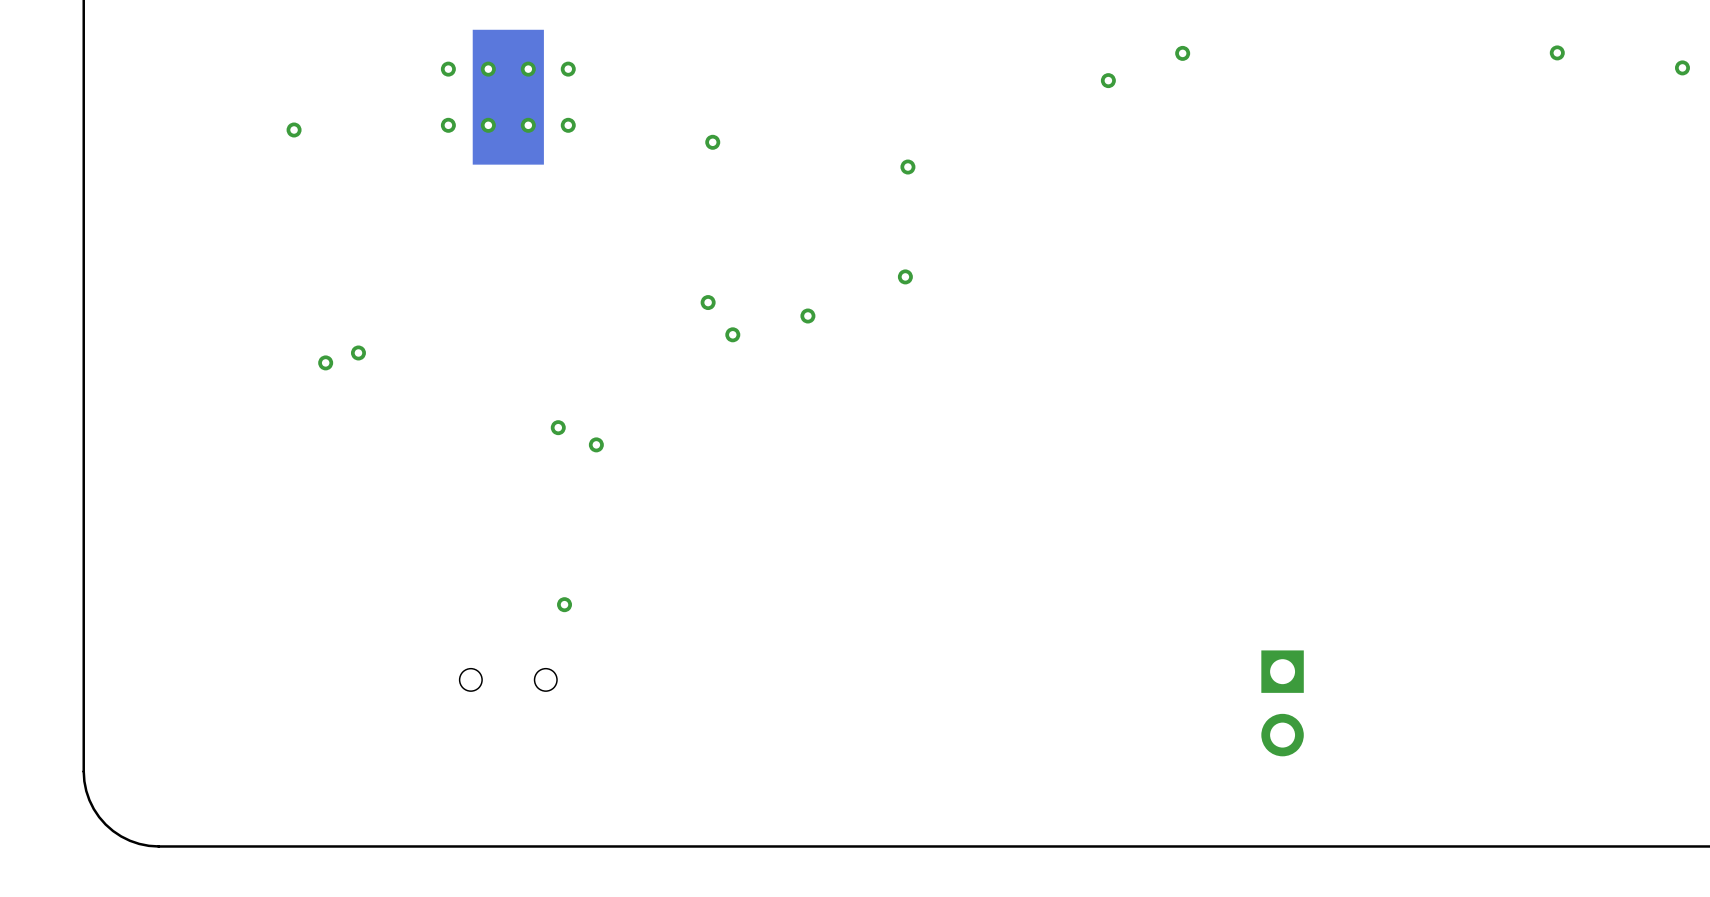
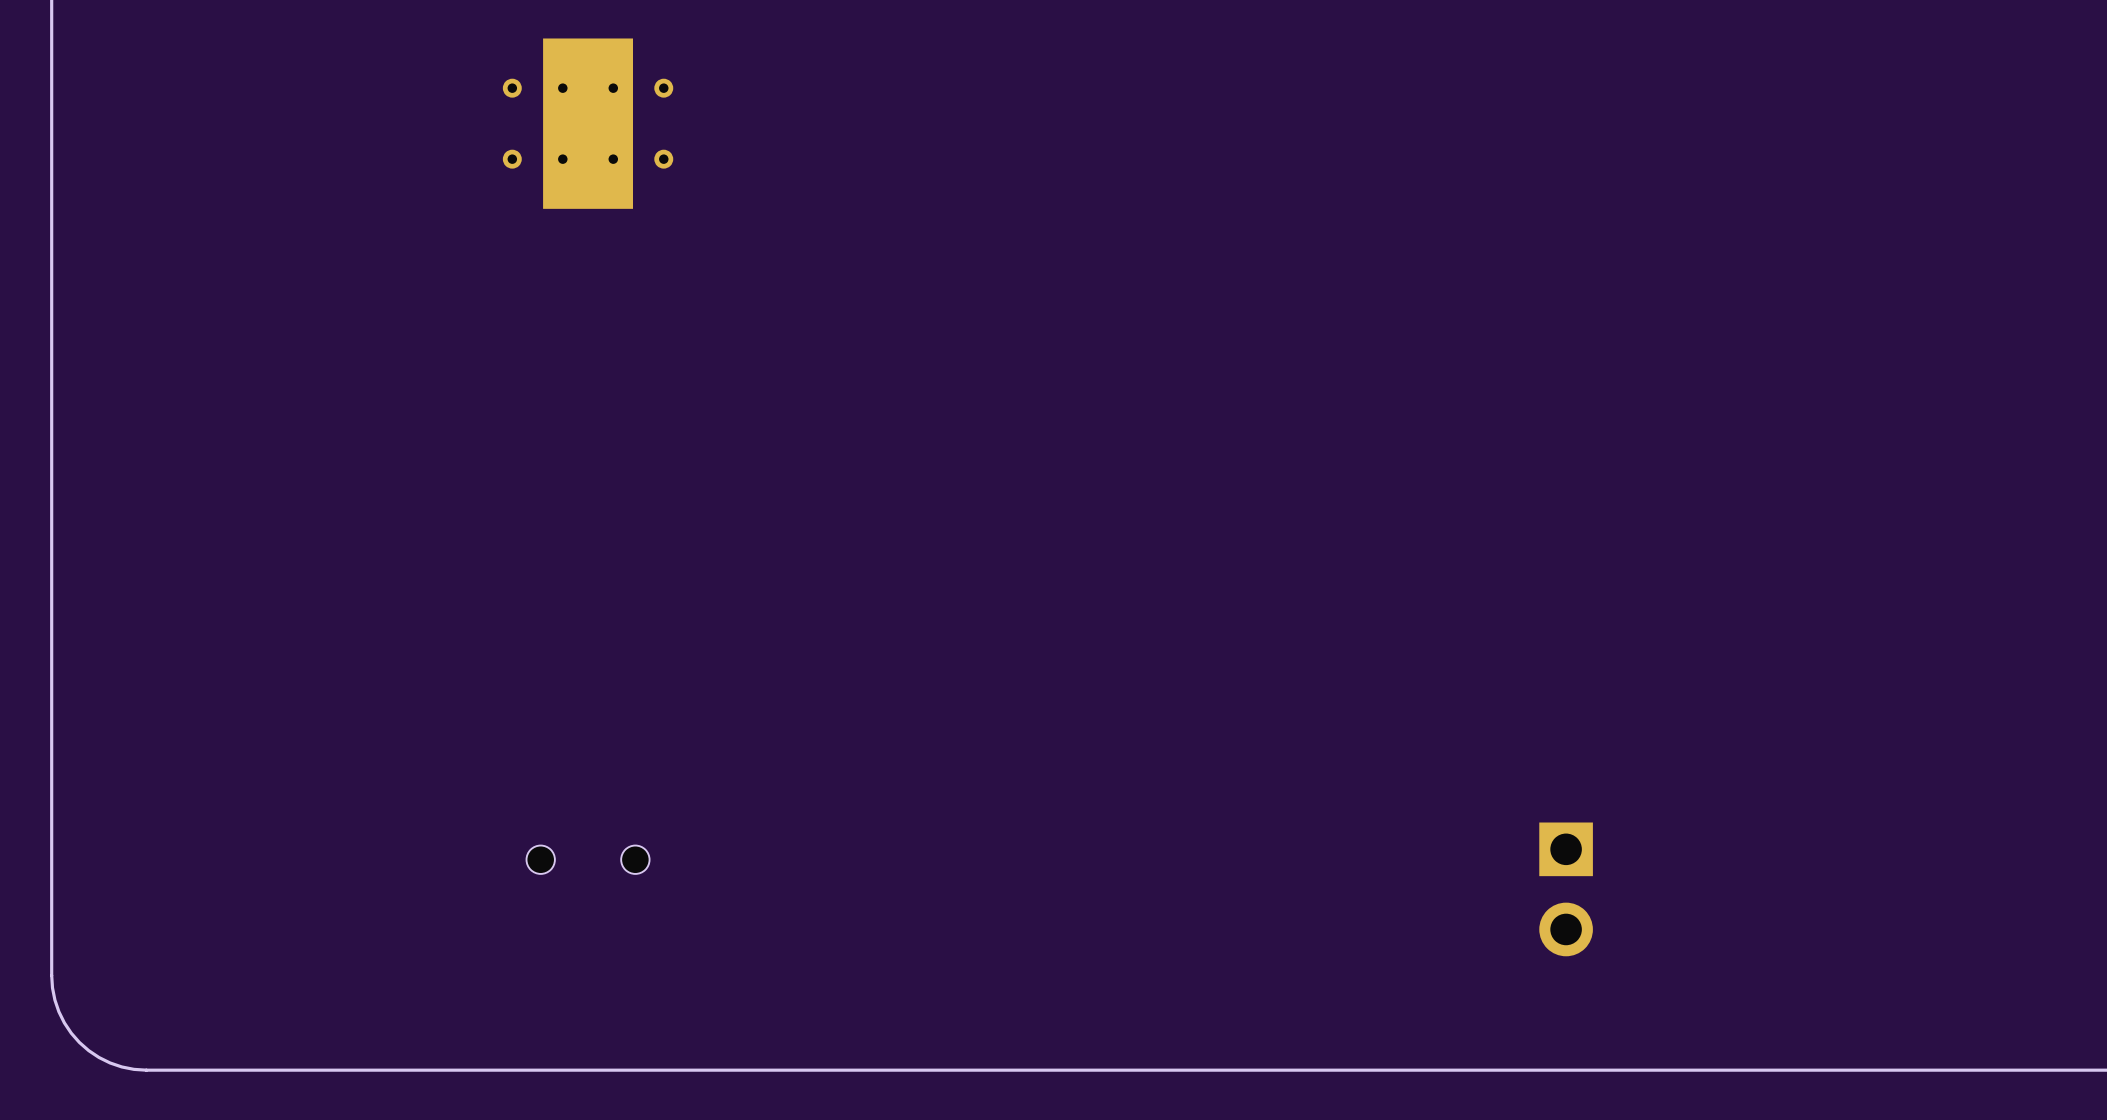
via: (1557, 52) -> none
via: (1182, 53) -> none
via: (1682, 67) -> none
via: (1108, 80) -> none
via: (294, 129) -> none
via: (712, 142) -> none
via: (907, 167) -> none
via: (905, 276) -> none
via: (708, 302) -> none
via: (807, 316) -> none
via: (732, 334) -> none
via: (358, 352) -> none
via: (325, 362) -> none
via: (558, 427) -> none
via: (596, 444) -> none
via: (564, 604) -> none

